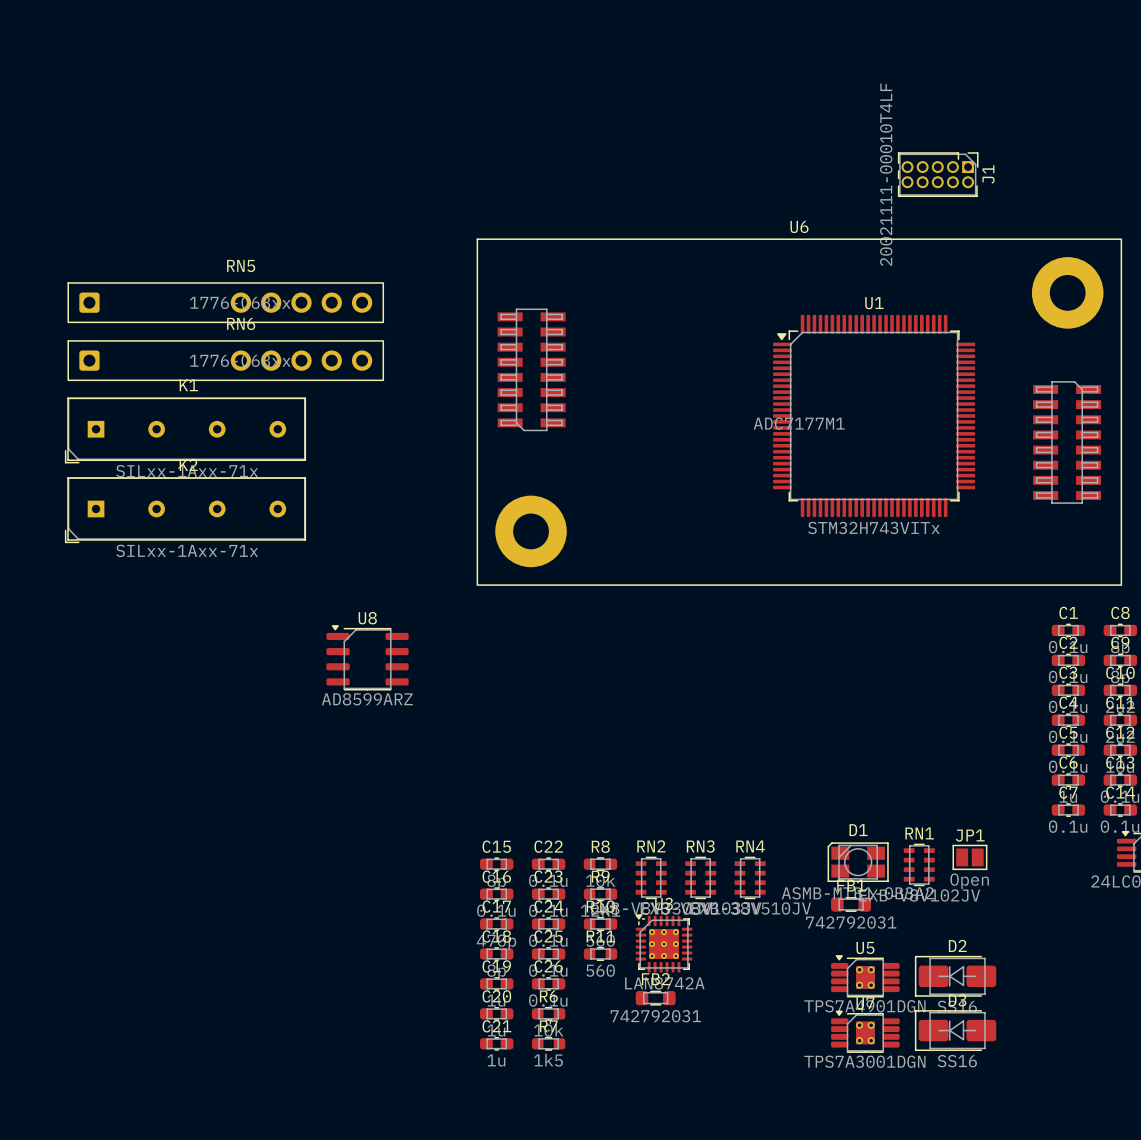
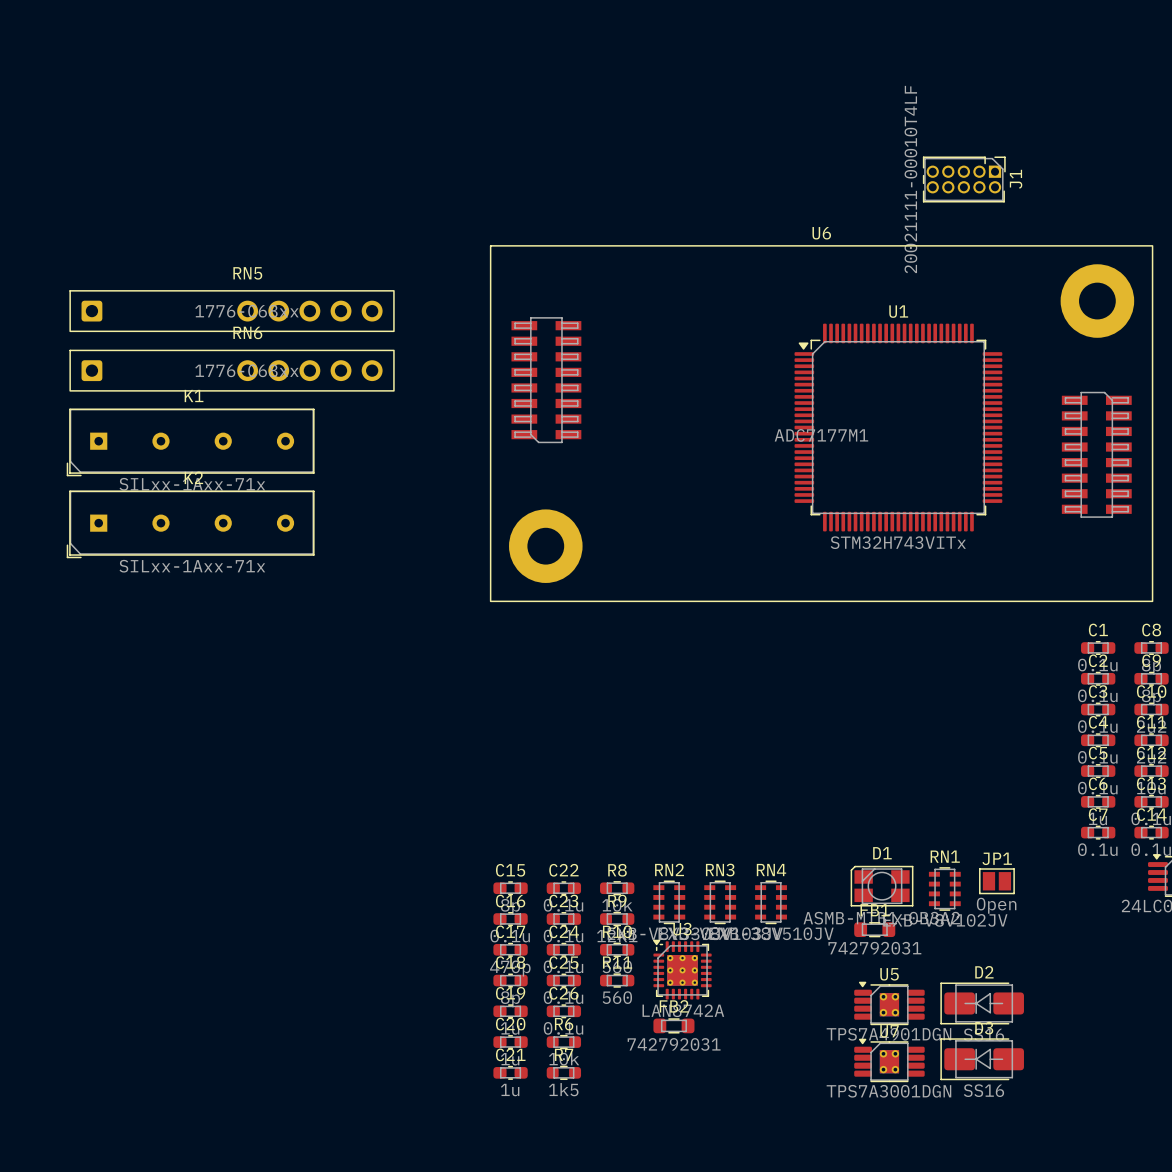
U8: AD8599ARZ (367, 657) -> none

